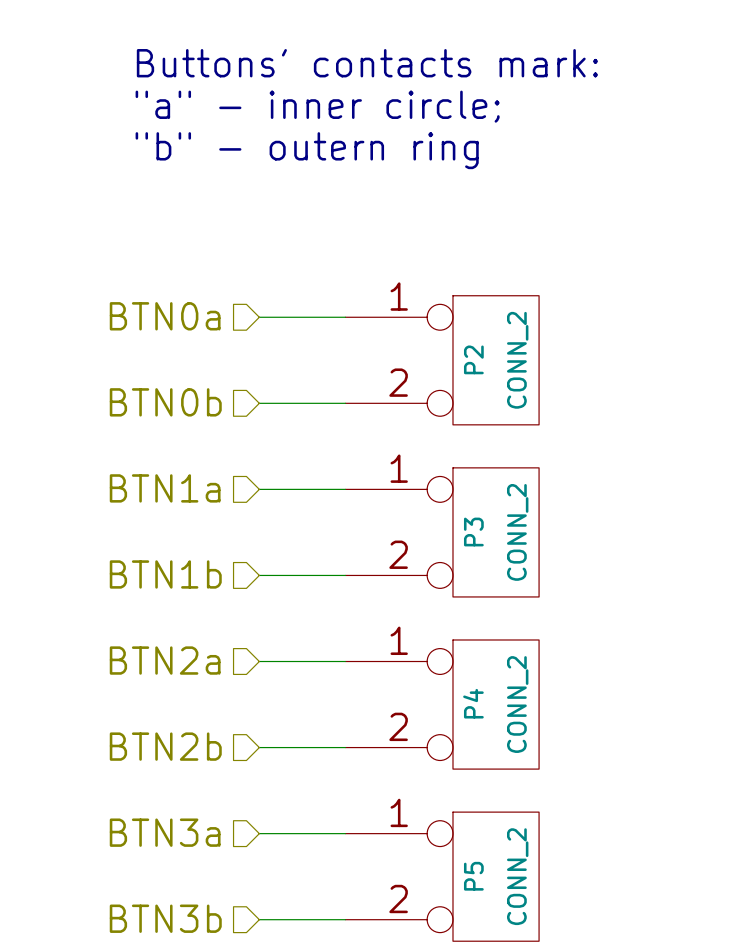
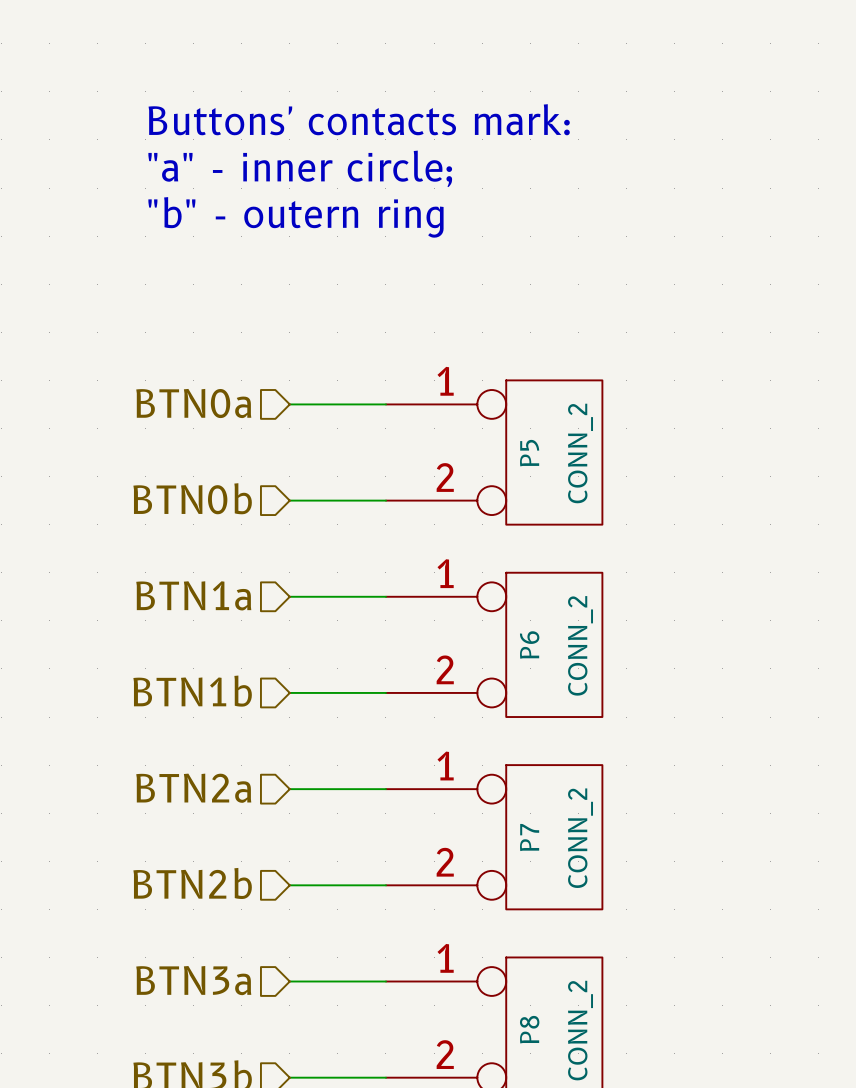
P2 name: P2 (473, 359) -> P5 (529, 453)
P3 name: P3 (473, 532) -> P6 (529, 644)
P4 name: P4 (473, 703) -> P7 (529, 837)
P5 name: P5 (473, 876) -> P8 (529, 1029)

